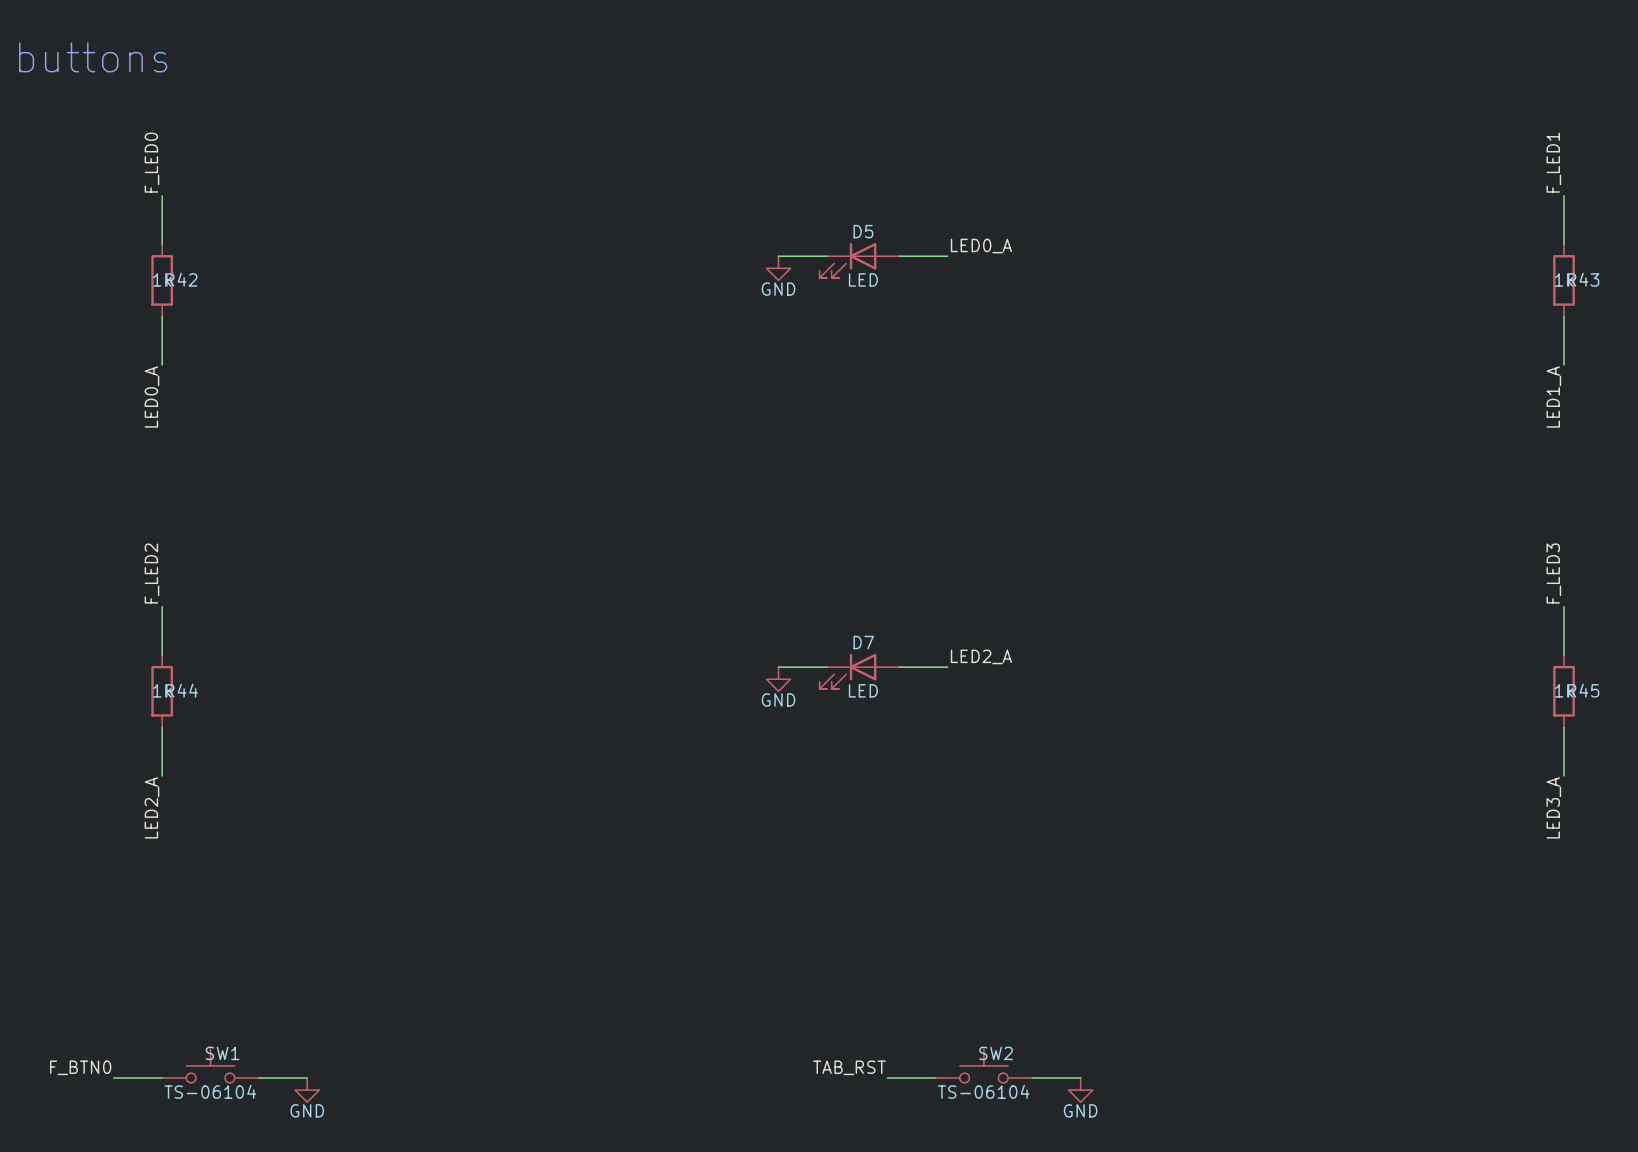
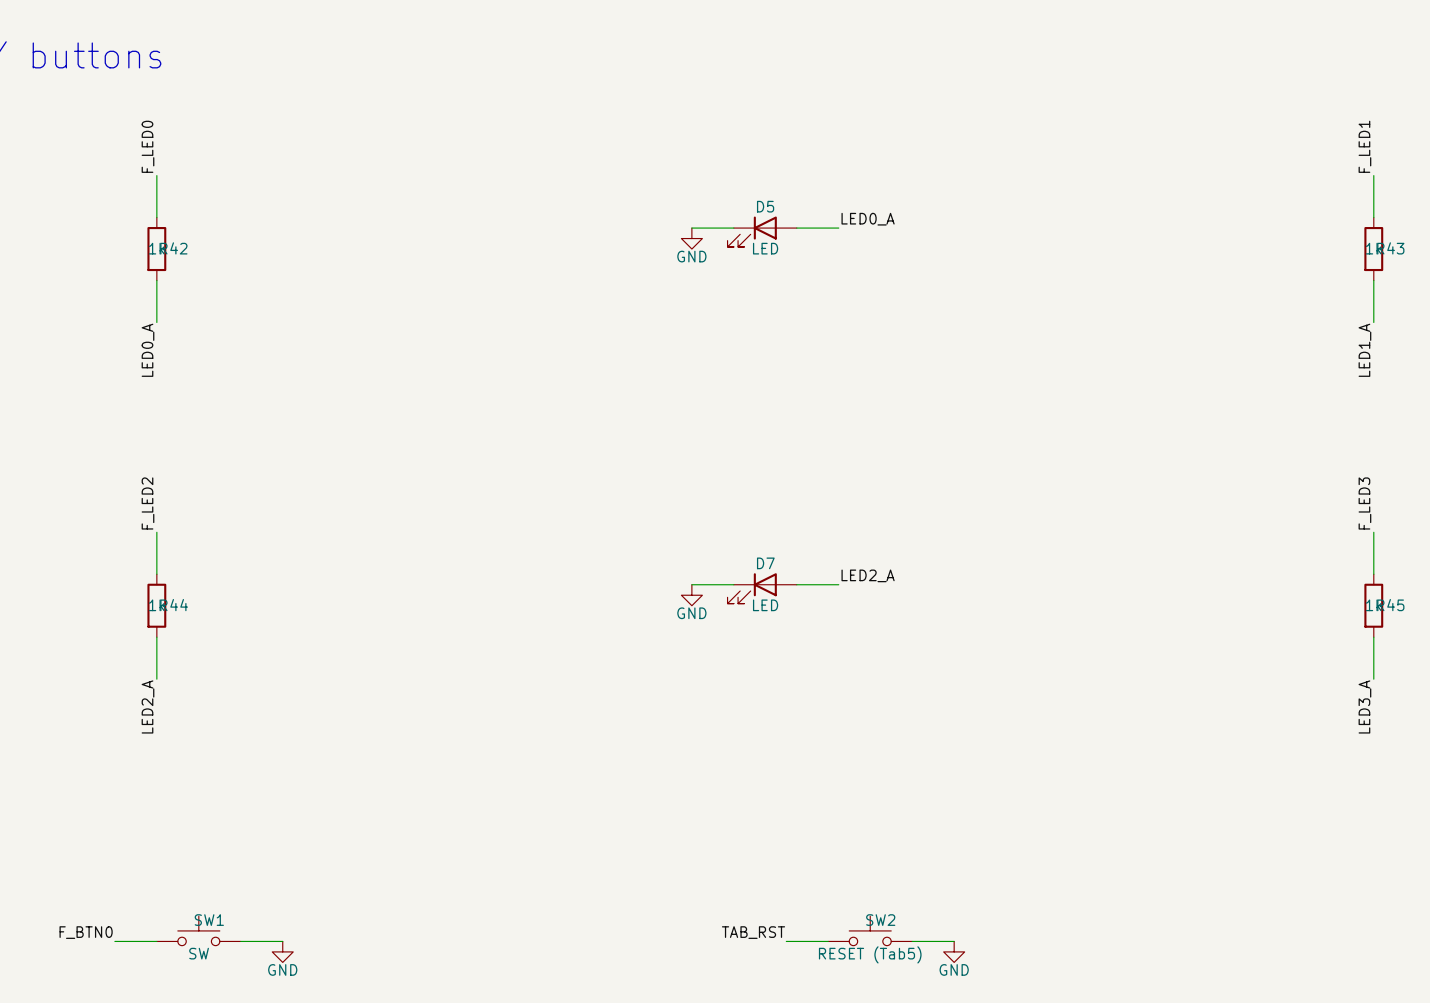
SW1 value: TS-06104 (210, 1091) -> SW (199, 953)
SW2 value: TS-06104 (983, 1091) -> RESET (Tab5) (870, 954)

